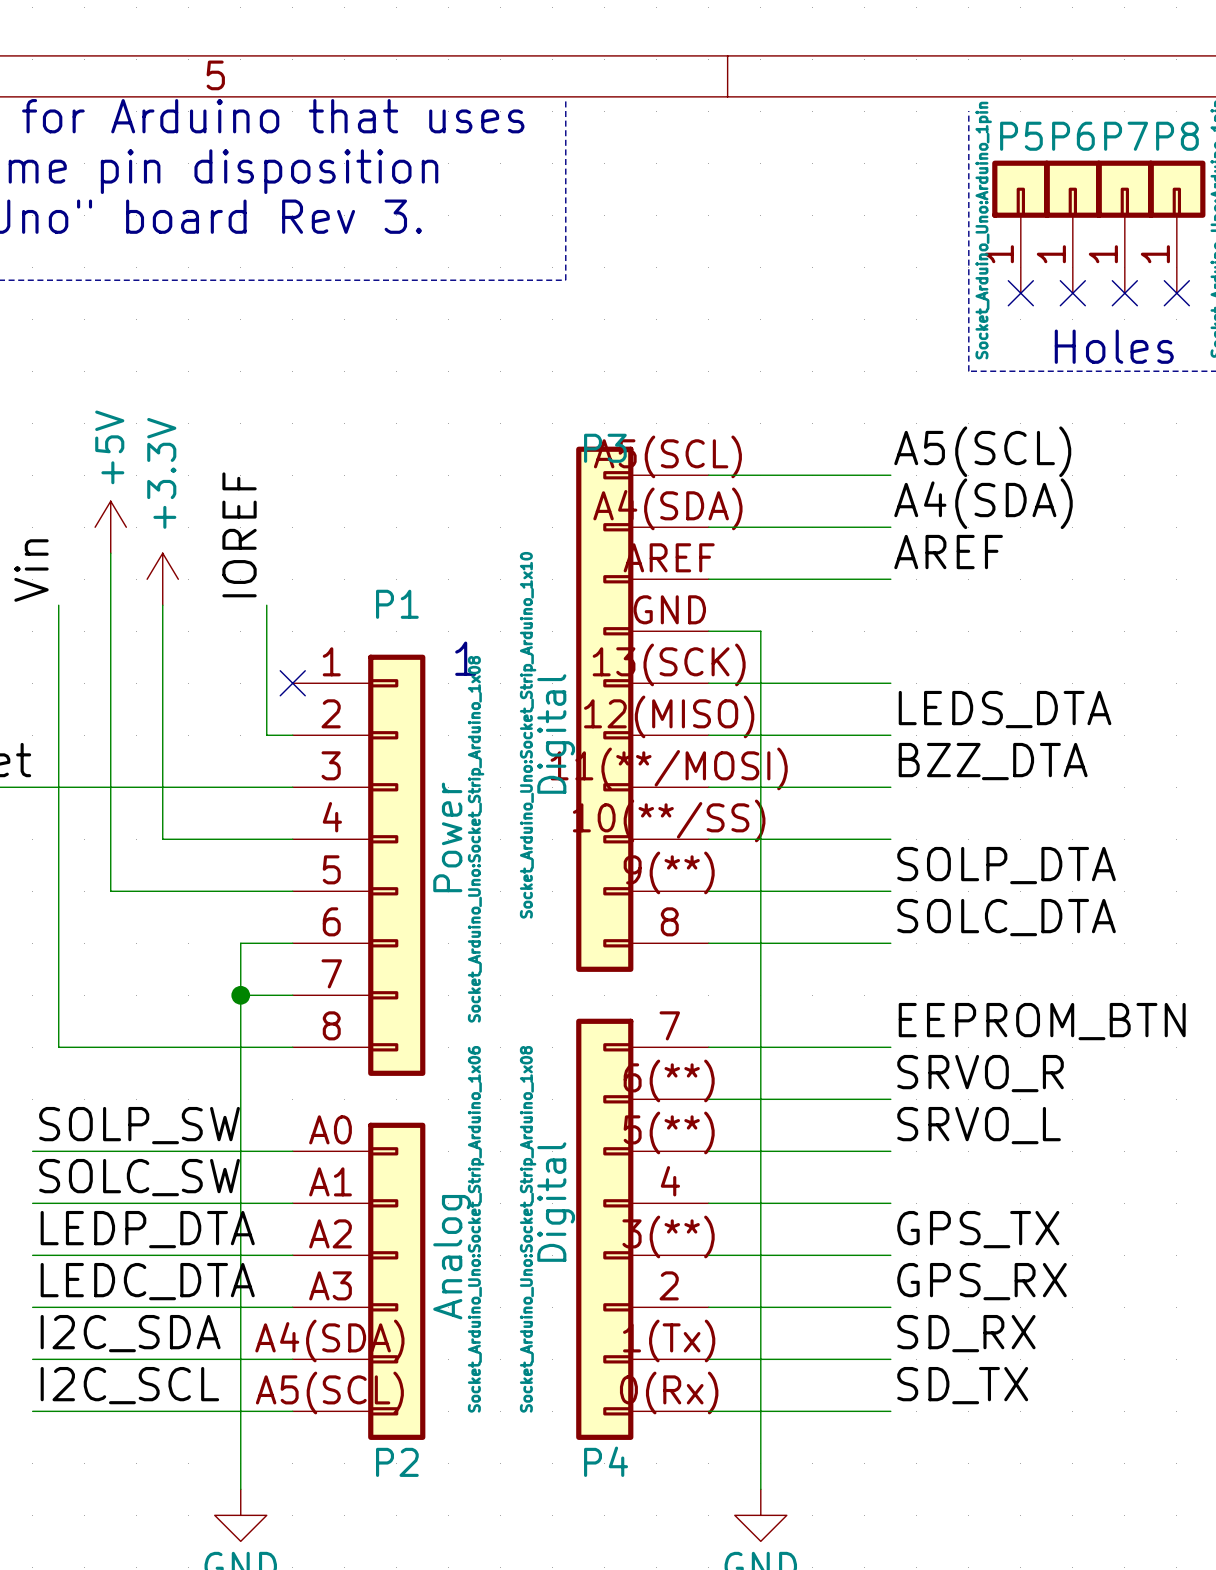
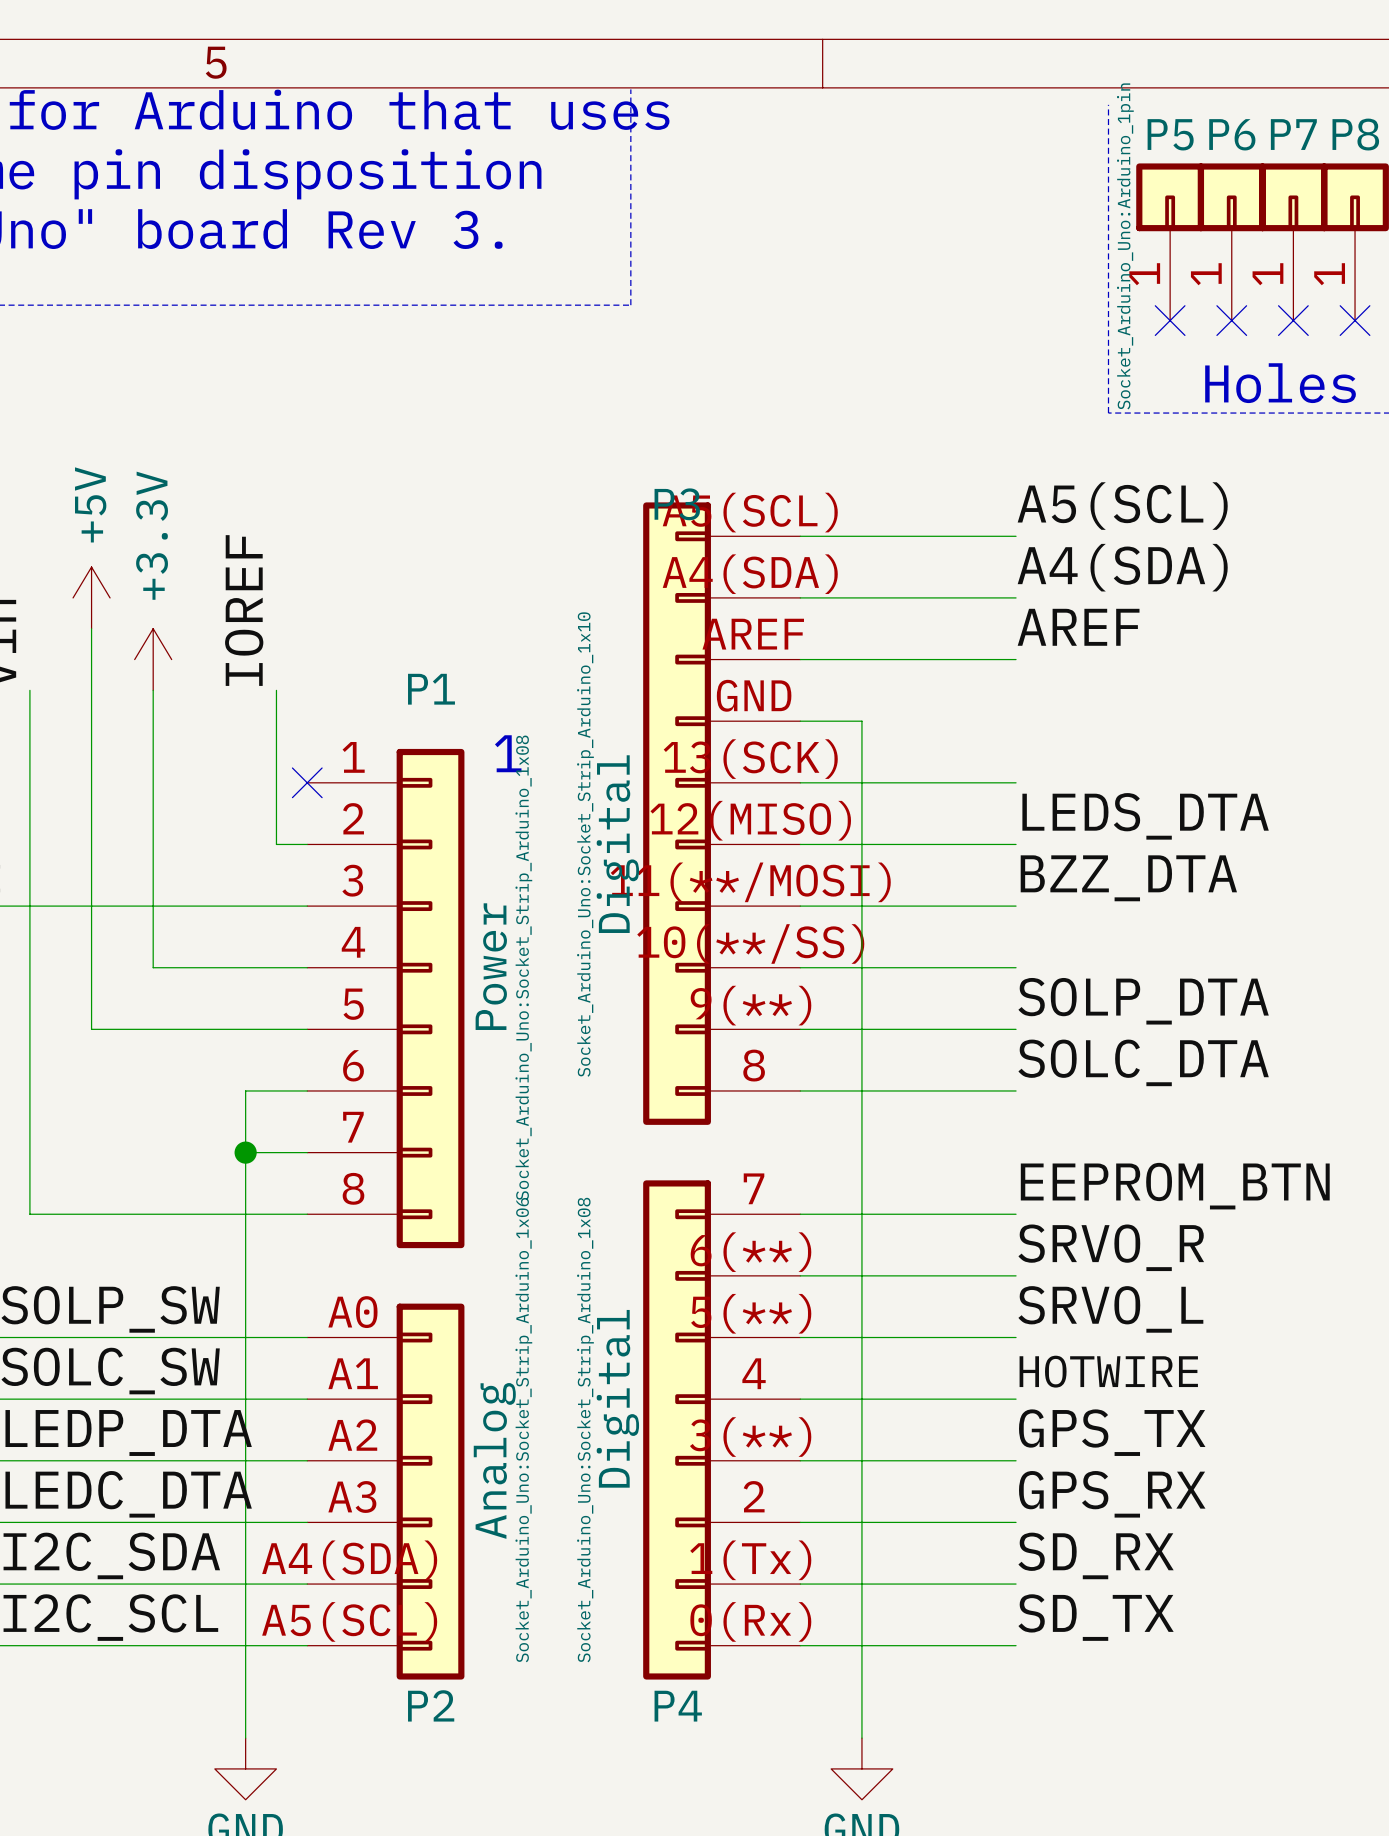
label: none -> HOTWIRE (1108, 1371)

